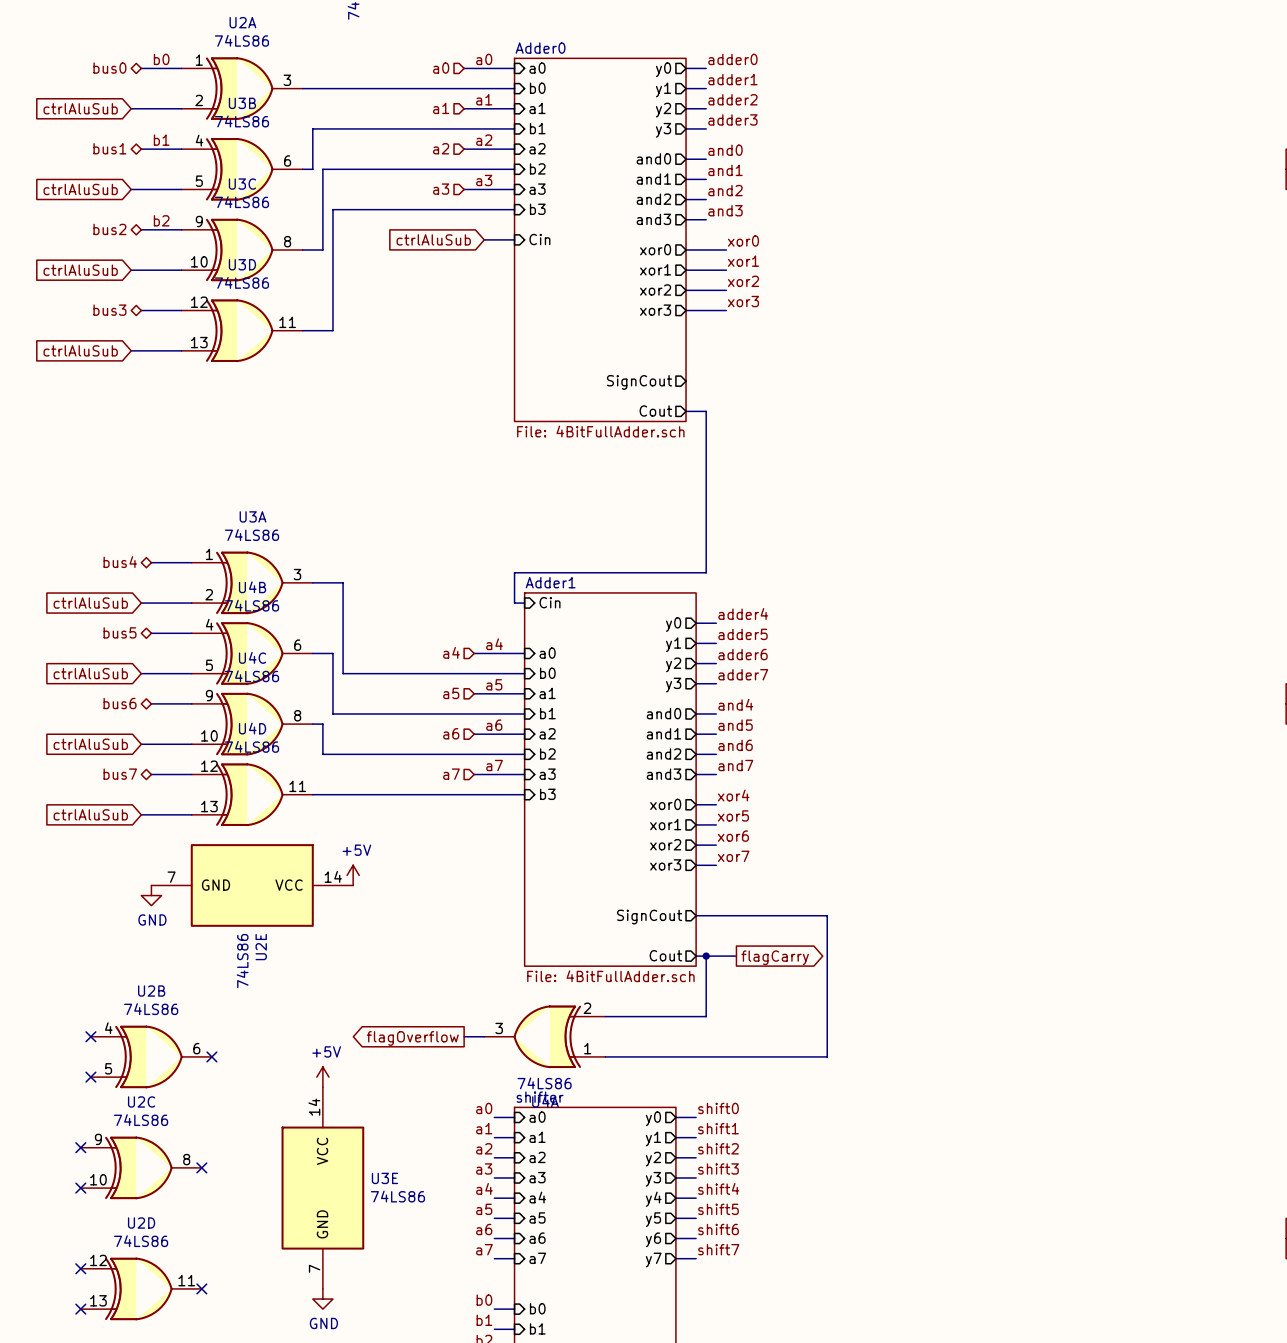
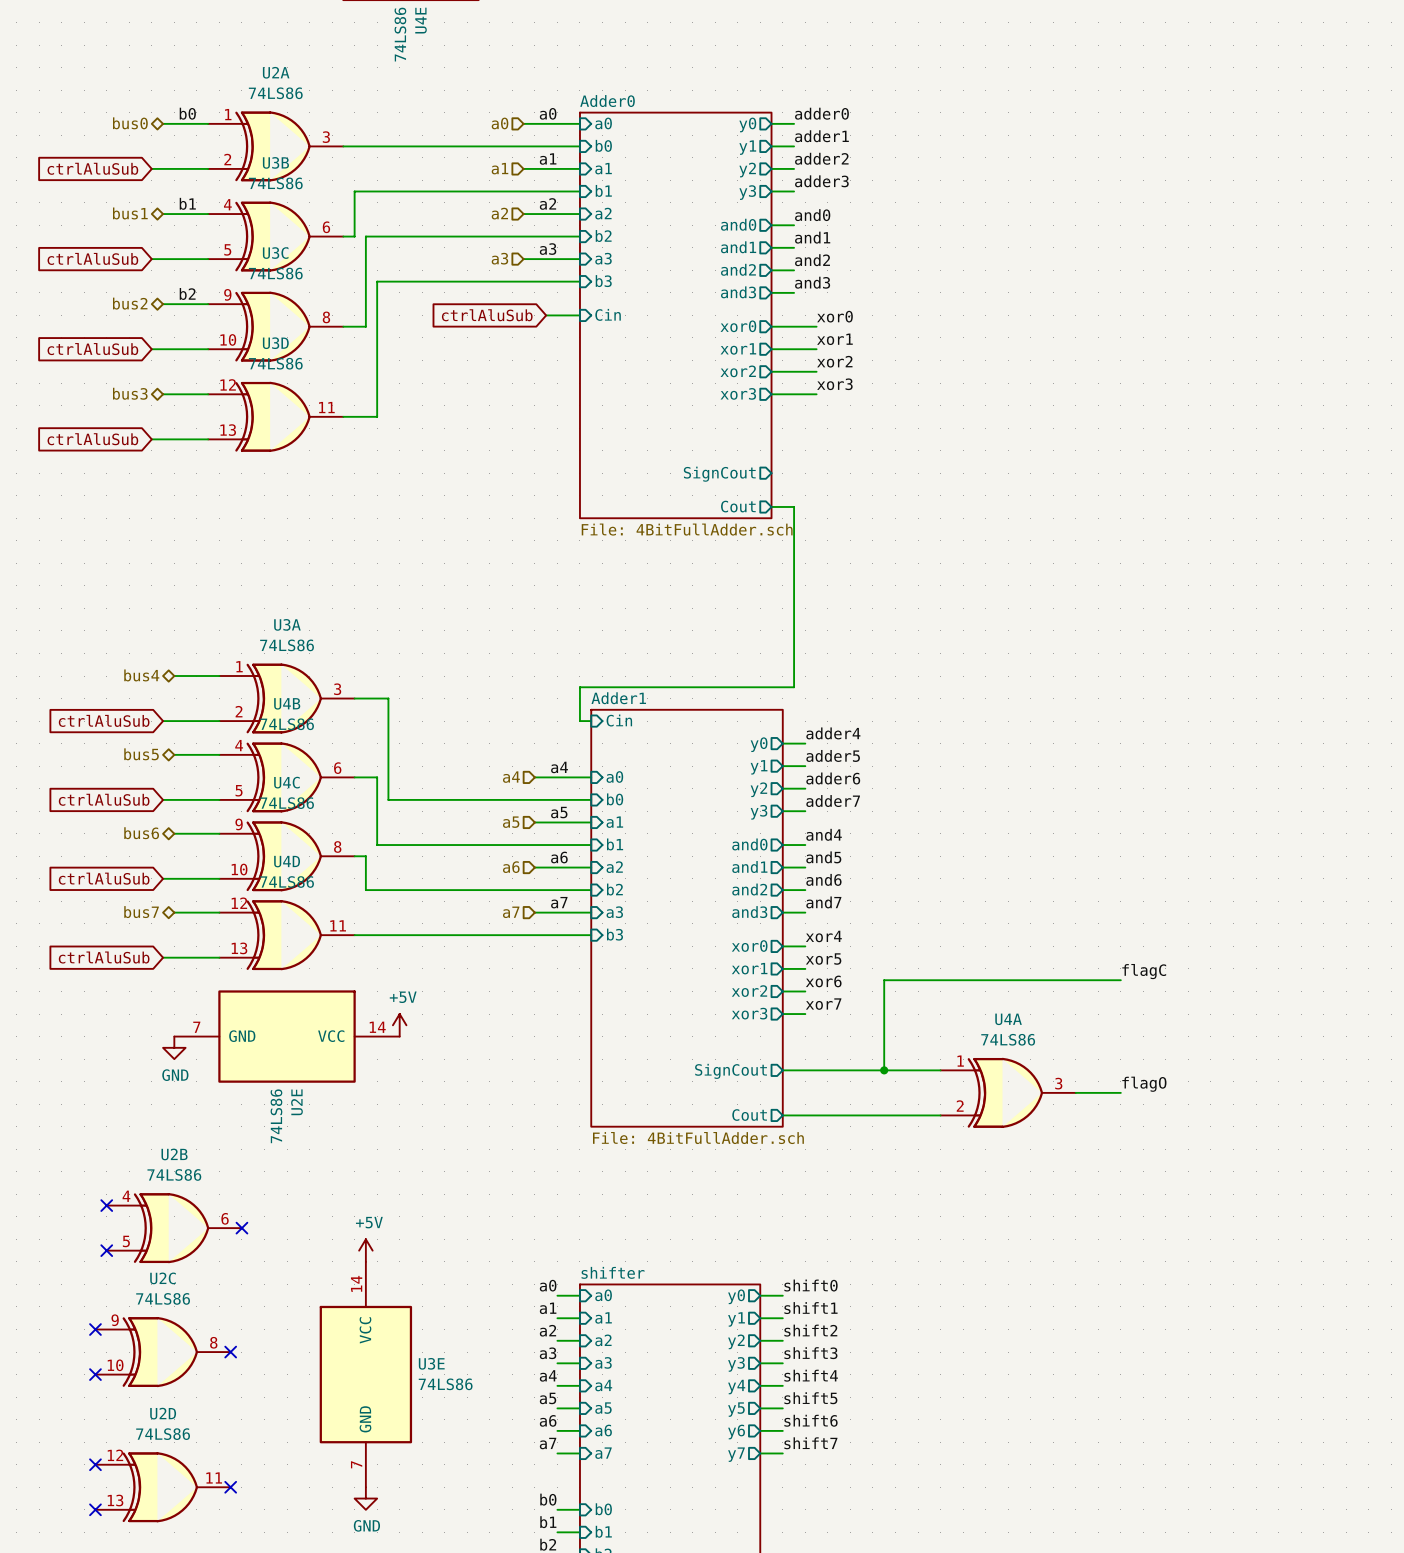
label: none -> flagC (1144, 971)
wire: none -> (1120, 980) (884, 980) (884, 1070)
junction: none -> (884, 1070)
wire: (827, 915) (827, 1056) (605, 1056) -> (929, 1070) (940, 1070)
label: none -> flagO (1144, 1084)
wire: none -> (1075, 1092) (1120, 1092)
wire: (706, 956) (706, 1016) (605, 1016) -> none
junction: (706, 956) -> none
wire: none -> (827, 1115) (940, 1115)
global label: flagCarry (775, 957) -> none
wire: (464, 1036) (484, 1036) -> none
U4A position: (544, 1036) -> (1008, 1092)
U4A rotation: 0° (547, 1036) -> 180° (1005, 1092)
global label: flagOverflow (412, 1038) -> none

